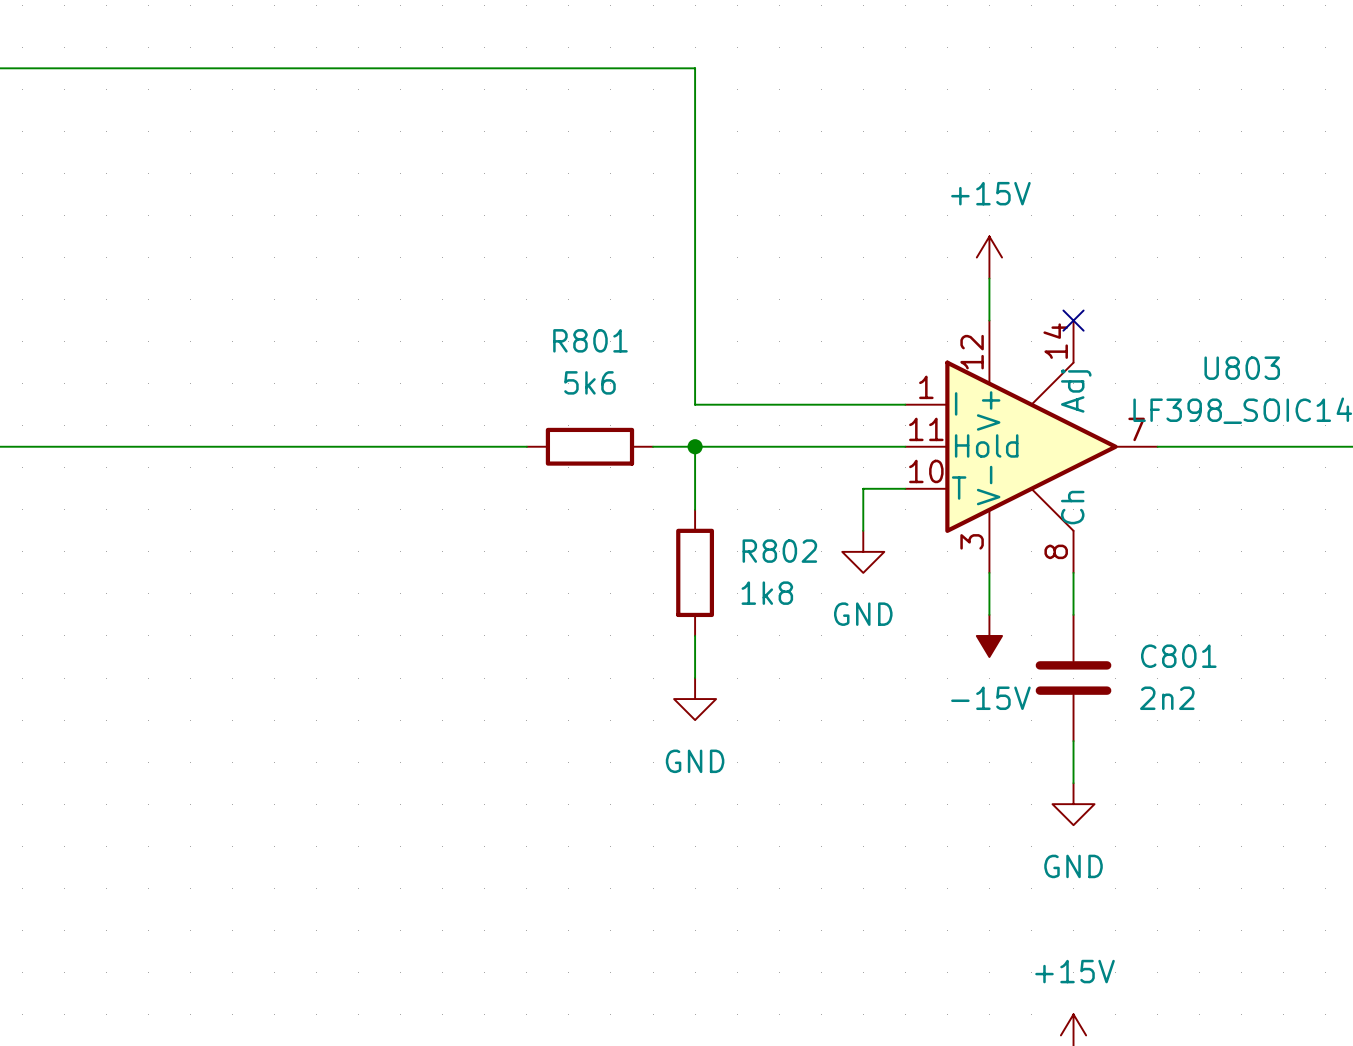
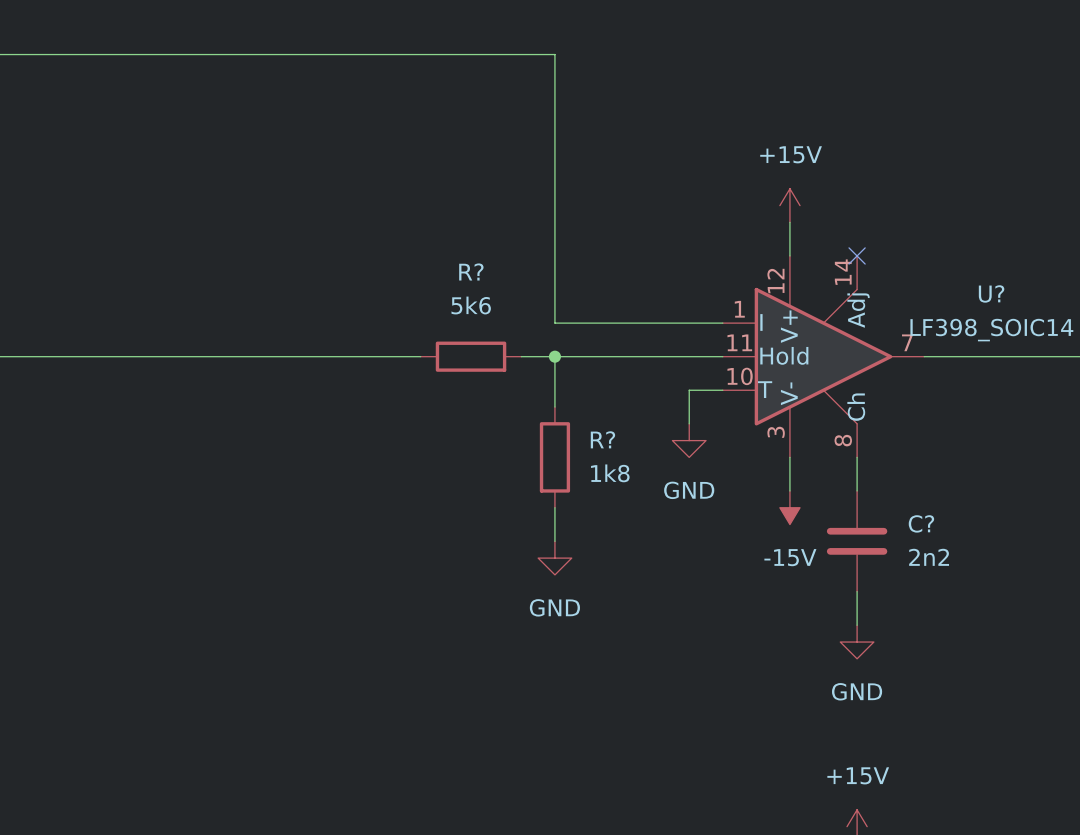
R801 name: R801 (590, 340) -> R? (471, 271)
U803 name: U803 (1242, 368) -> U? (991, 293)
R802 name: R802 (779, 551) -> R? (602, 439)
C801 name: C801 (1178, 656) -> C? (921, 523)

